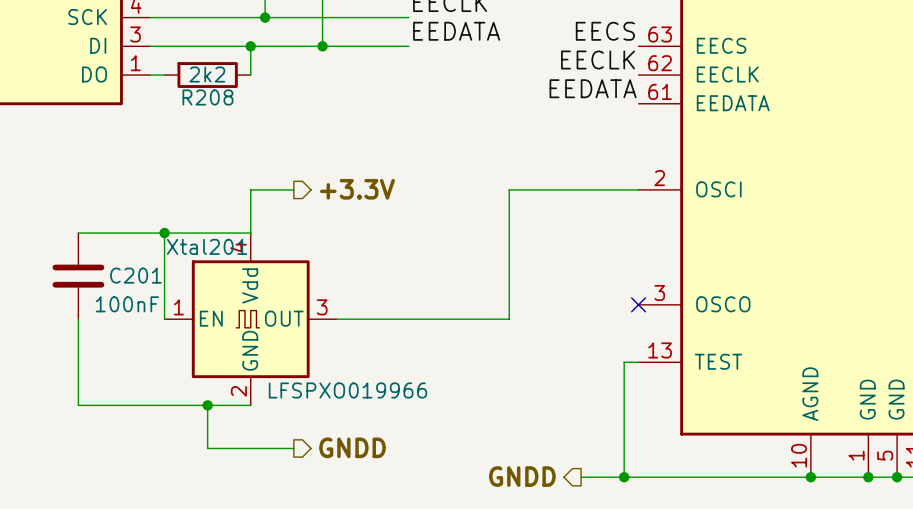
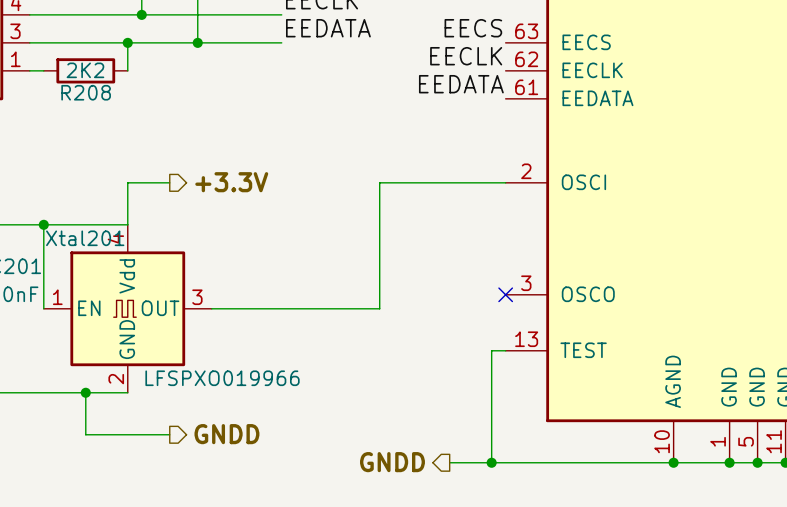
R208 value: 2k2 (207, 74) -> 2K2 (85, 70)

